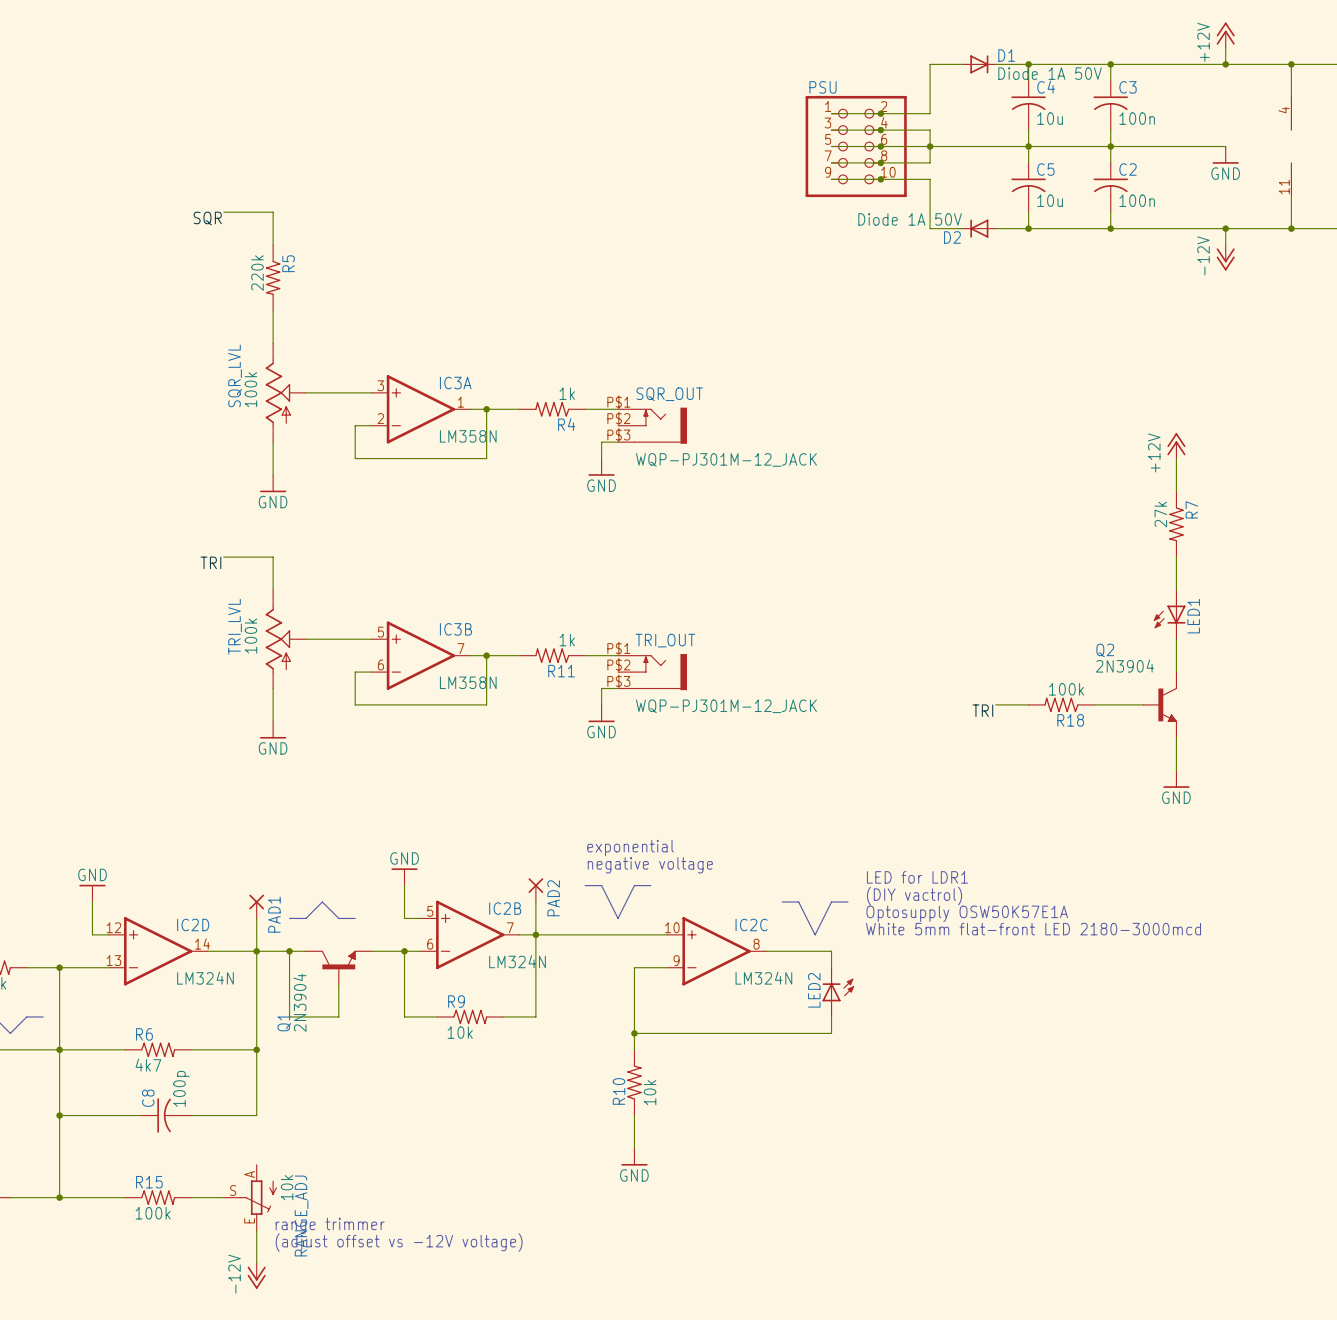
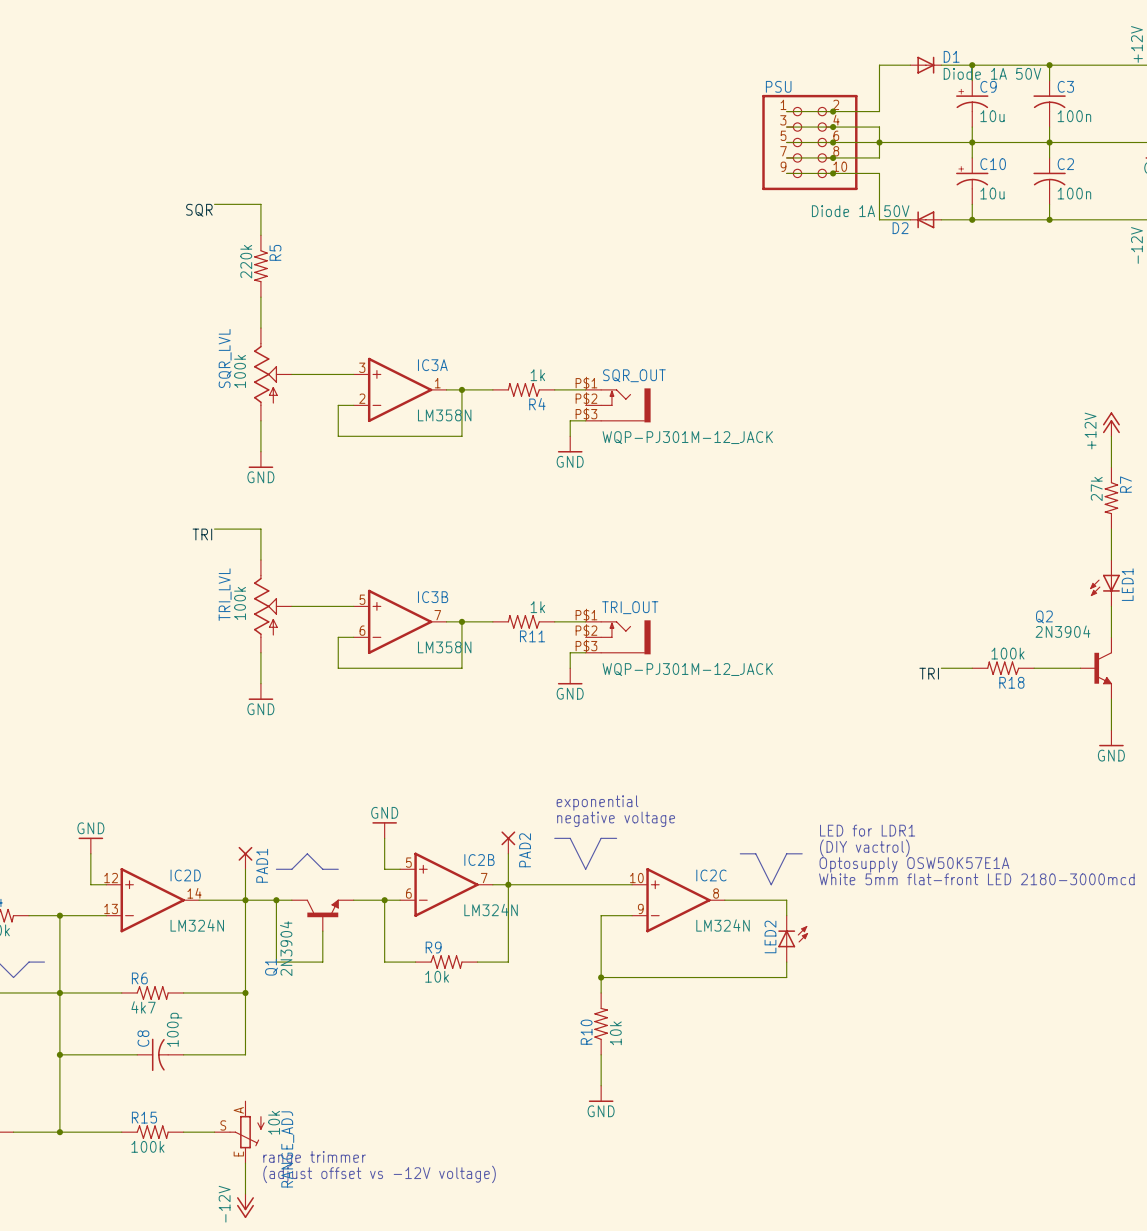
C4: 10u (1028, 105) -> none
C9: none -> 10u (972, 103)
C5: 10u (1028, 187) -> none
C10: none -> 10u (972, 181)

